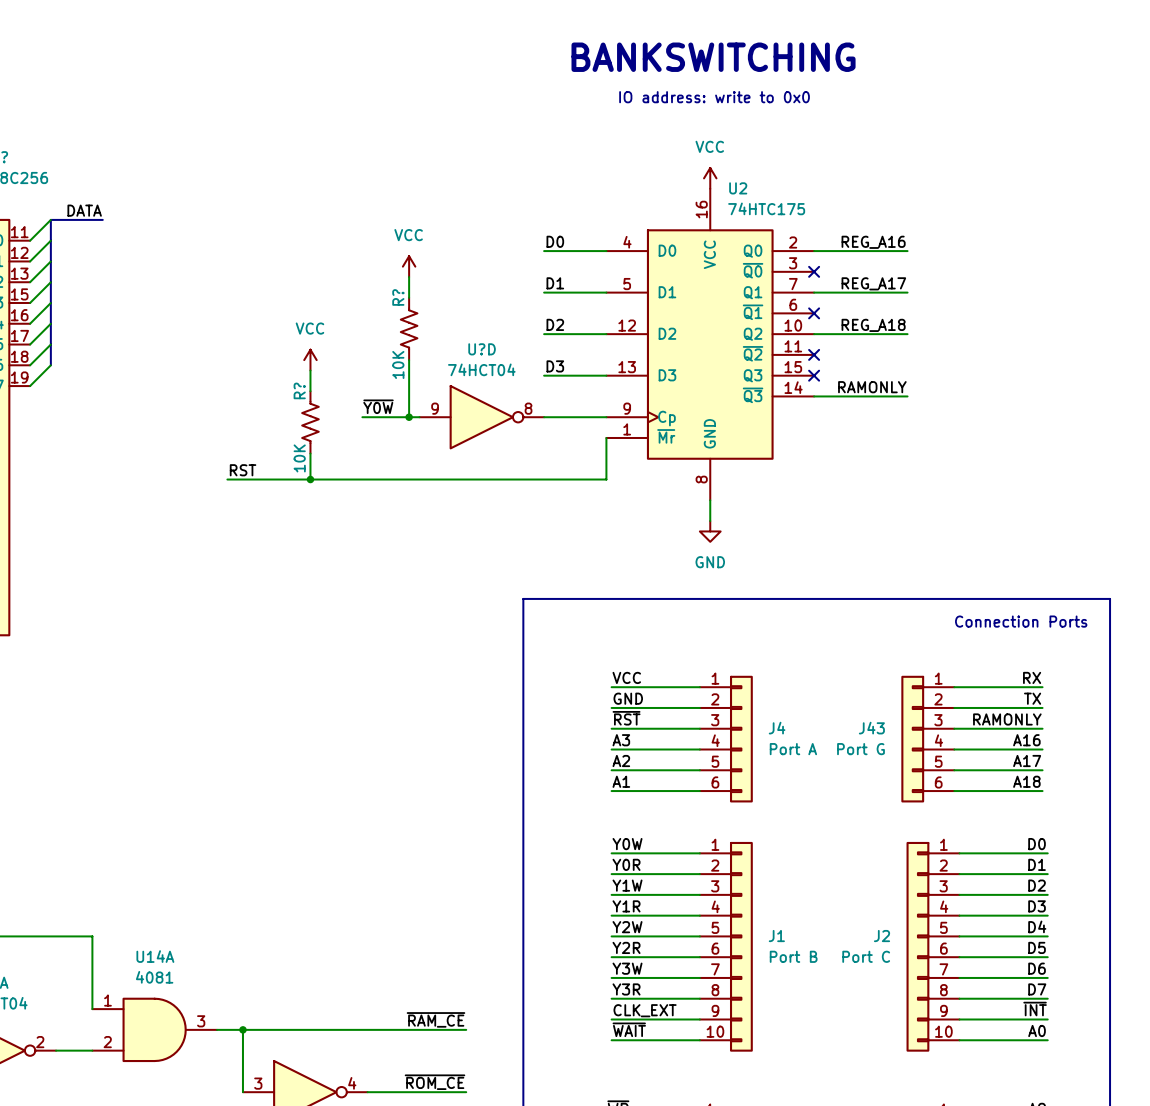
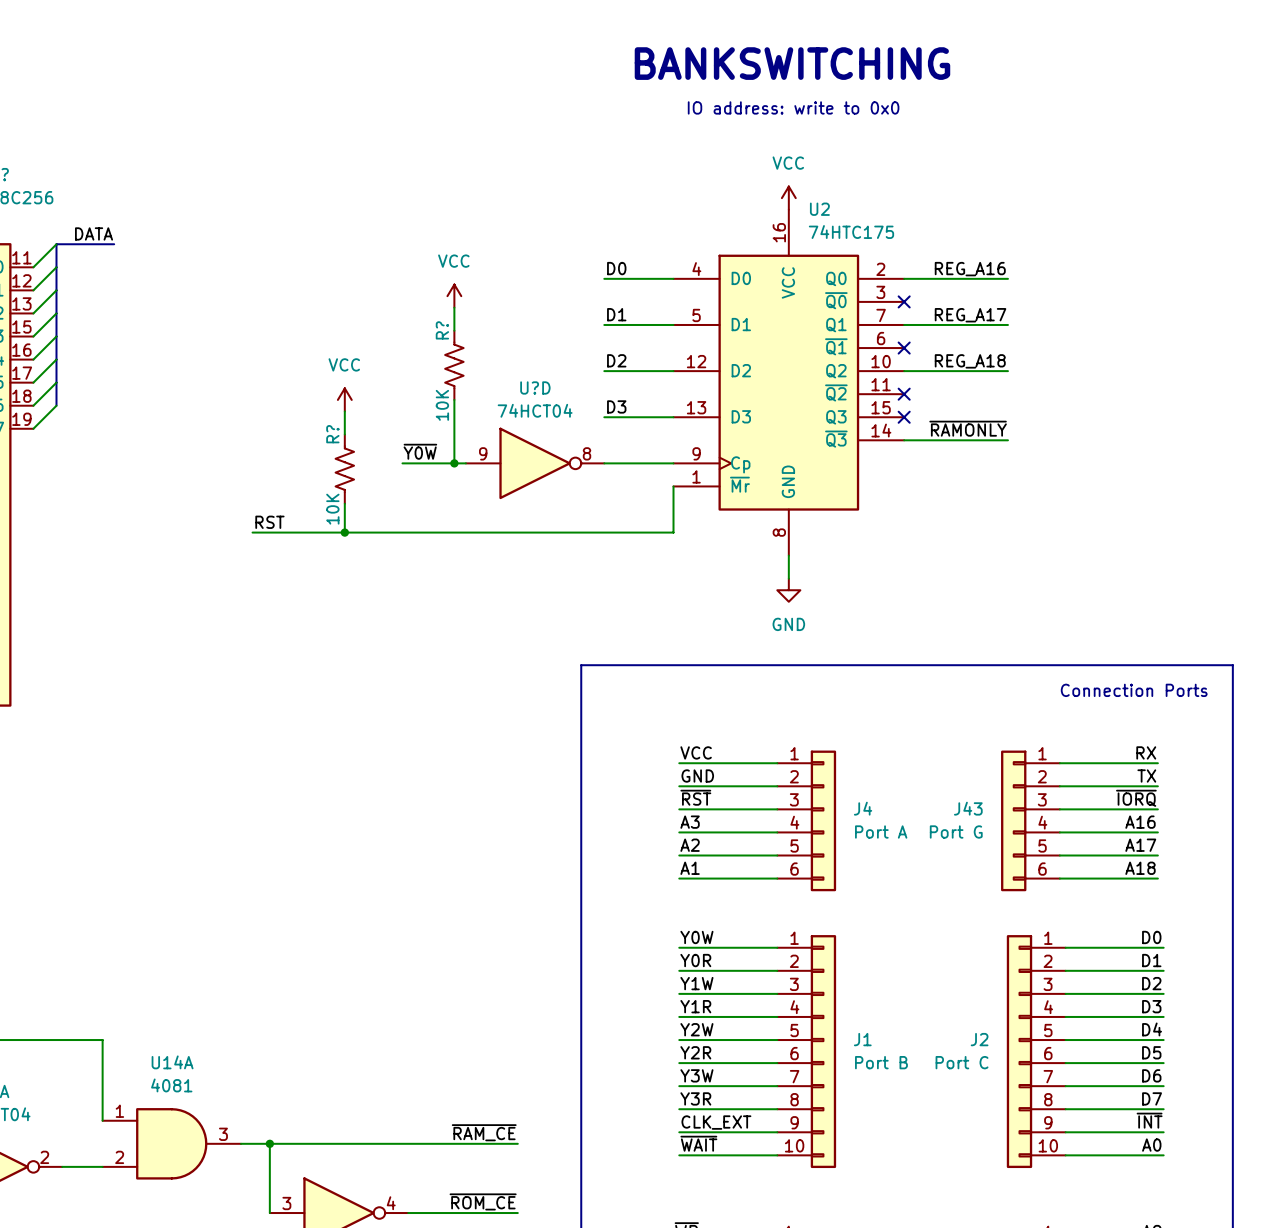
label: RAMONLY (872, 387) -> ~{RAMONLY} (968, 428)
label: RAMONLY (1007, 719) -> ~{IORQ} (1136, 798)

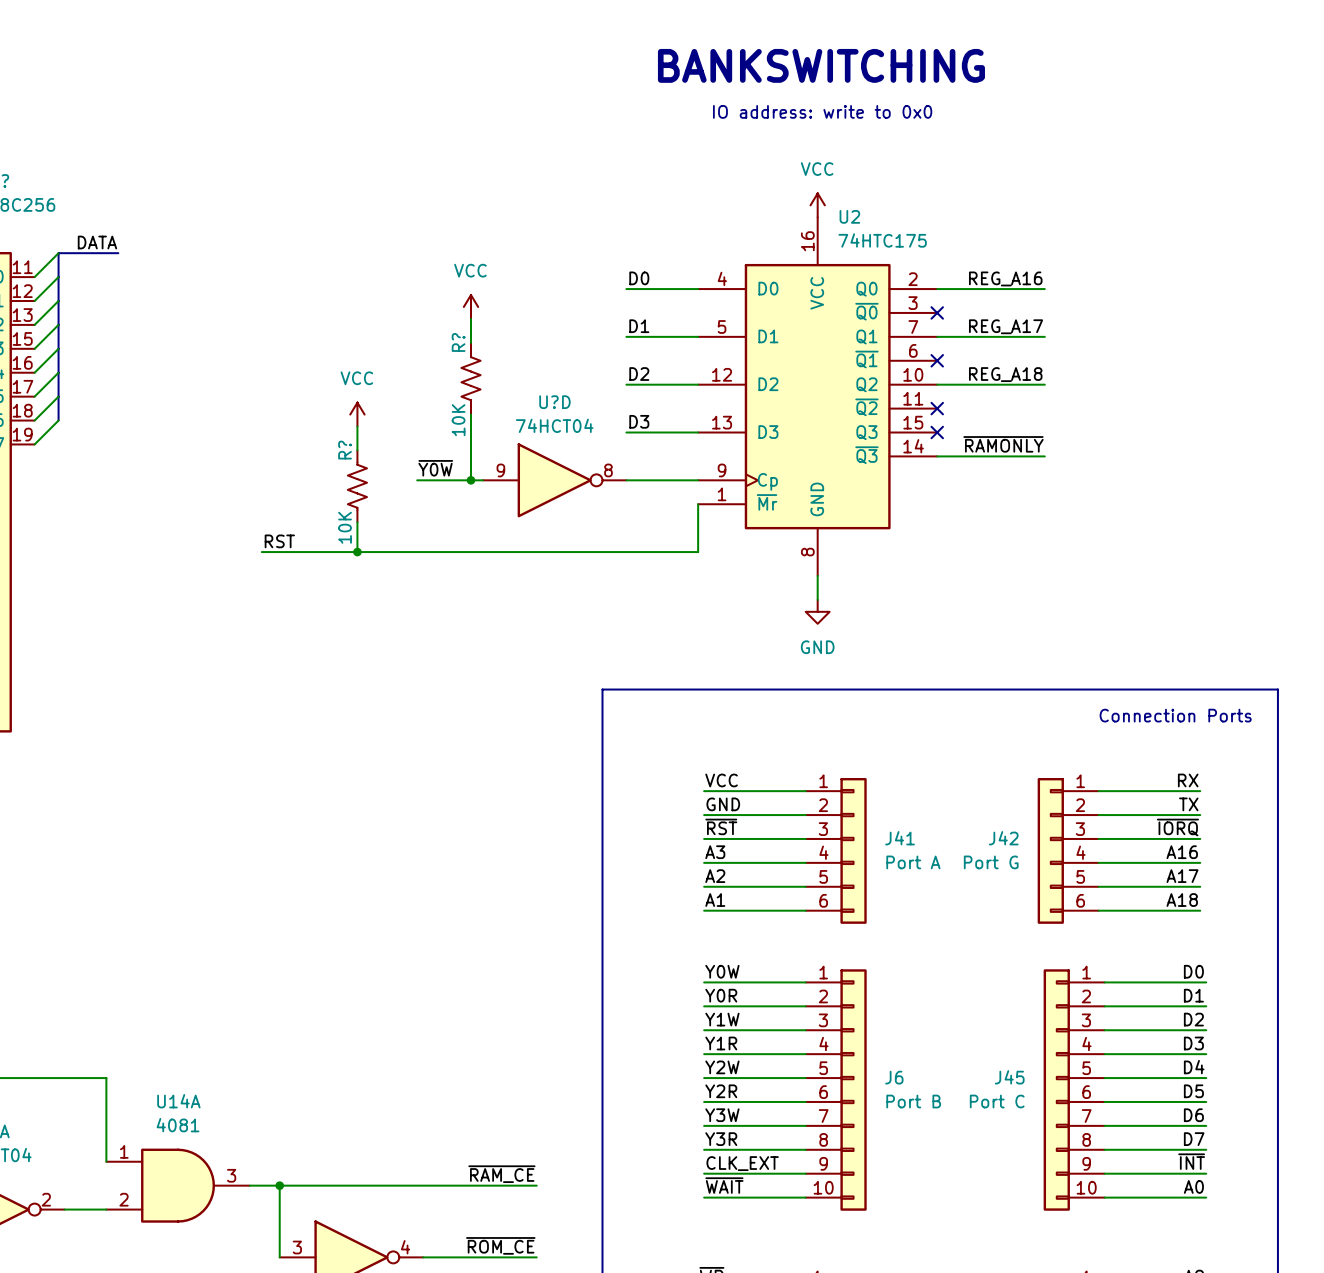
J4 name: J4 (863, 808) -> J41 (900, 838)
J43 name: J43 (968, 808) -> J42 (1003, 838)
J1 name: J1 (862, 1039) -> J6 (894, 1077)
J2 name: J2 (979, 1039) -> J45 (1009, 1077)

